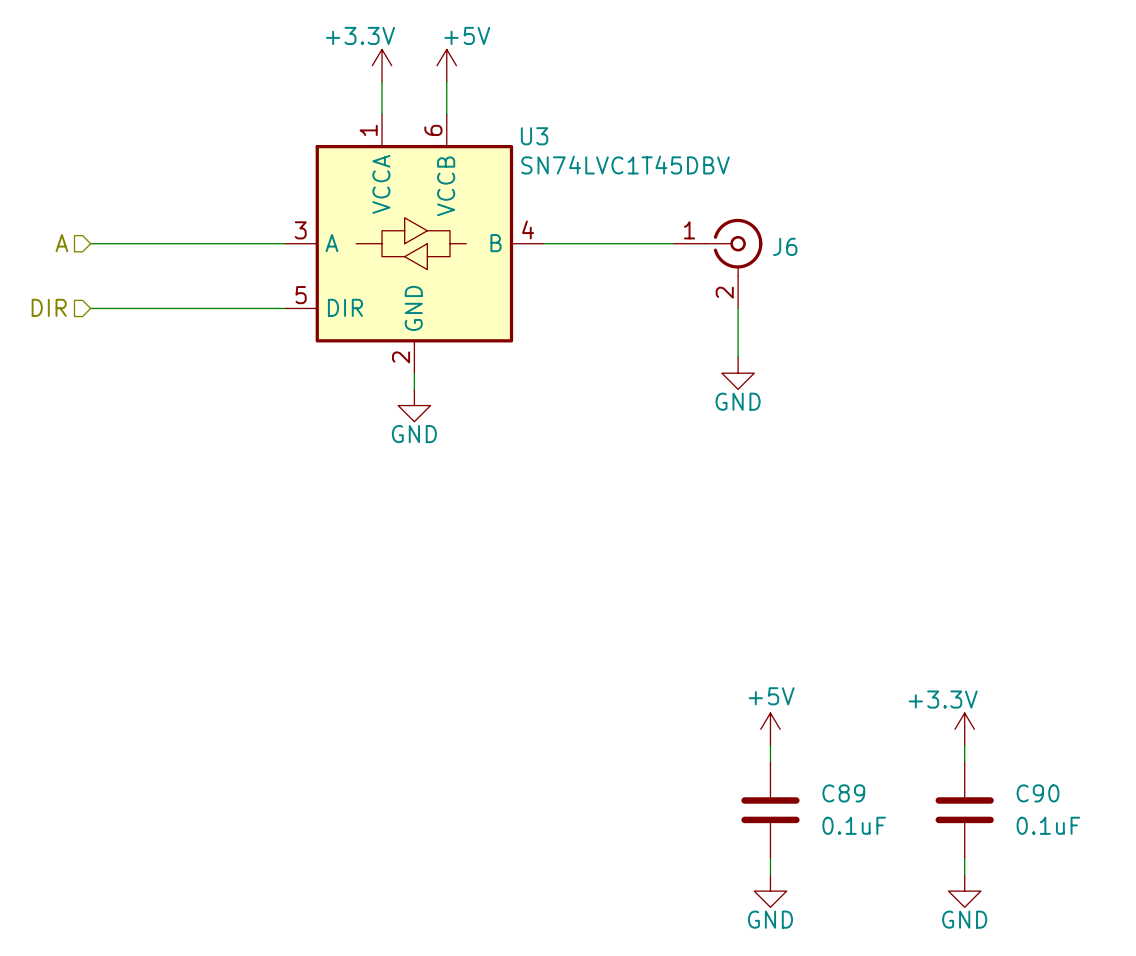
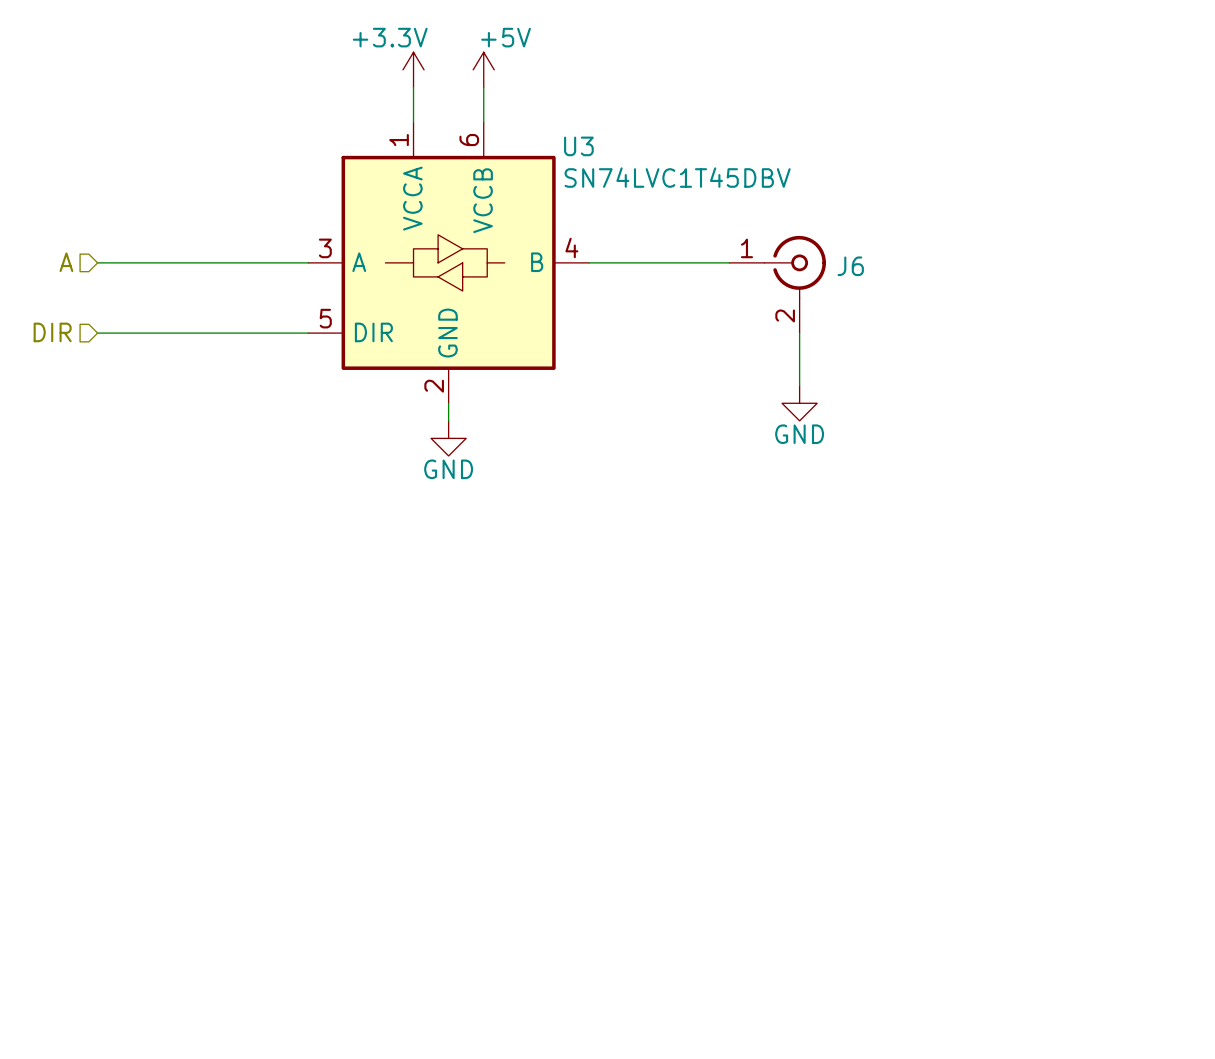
power symbol: +5V (770, 729) -> none
power symbol: +3.3V (964, 729) -> none
wire: (770, 745) (770, 761) -> none
wire: (964, 745) (964, 761) -> none
C89: 0.1uF (770, 810) -> none
C90: 0.1uF (964, 810) -> none
wire: (770, 858) (770, 874) -> none
wire: (964, 858) (964, 874) -> none
power symbol: GND (770, 891) -> none
power symbol: GND (964, 891) -> none

